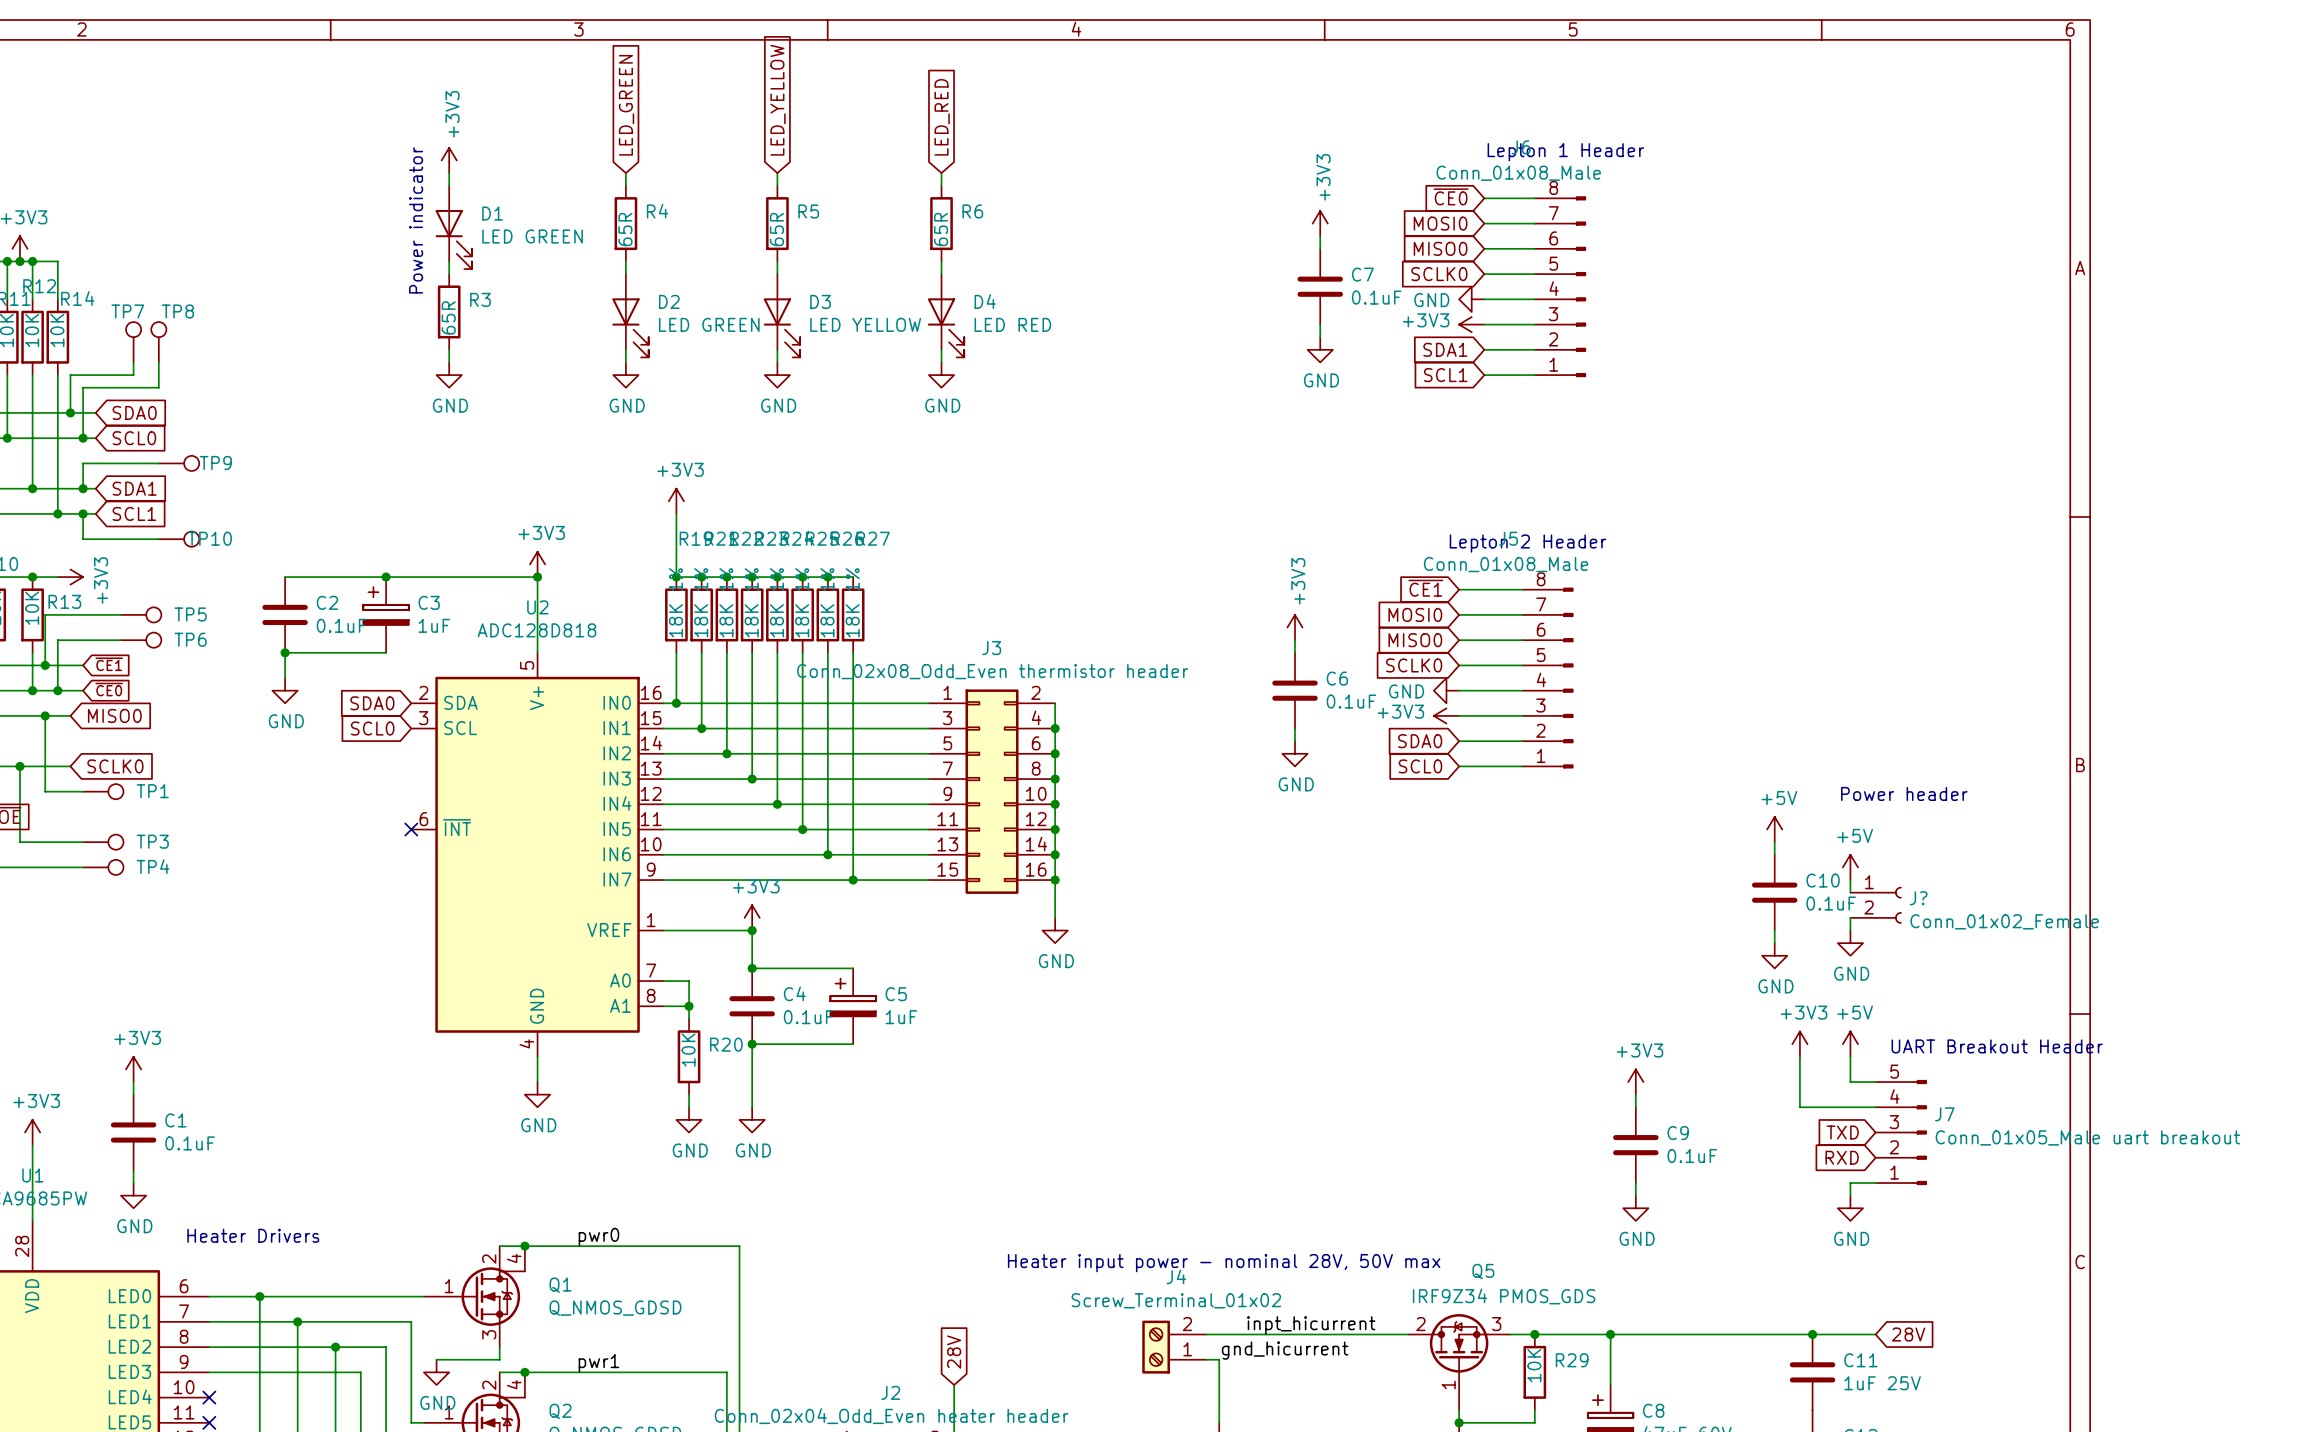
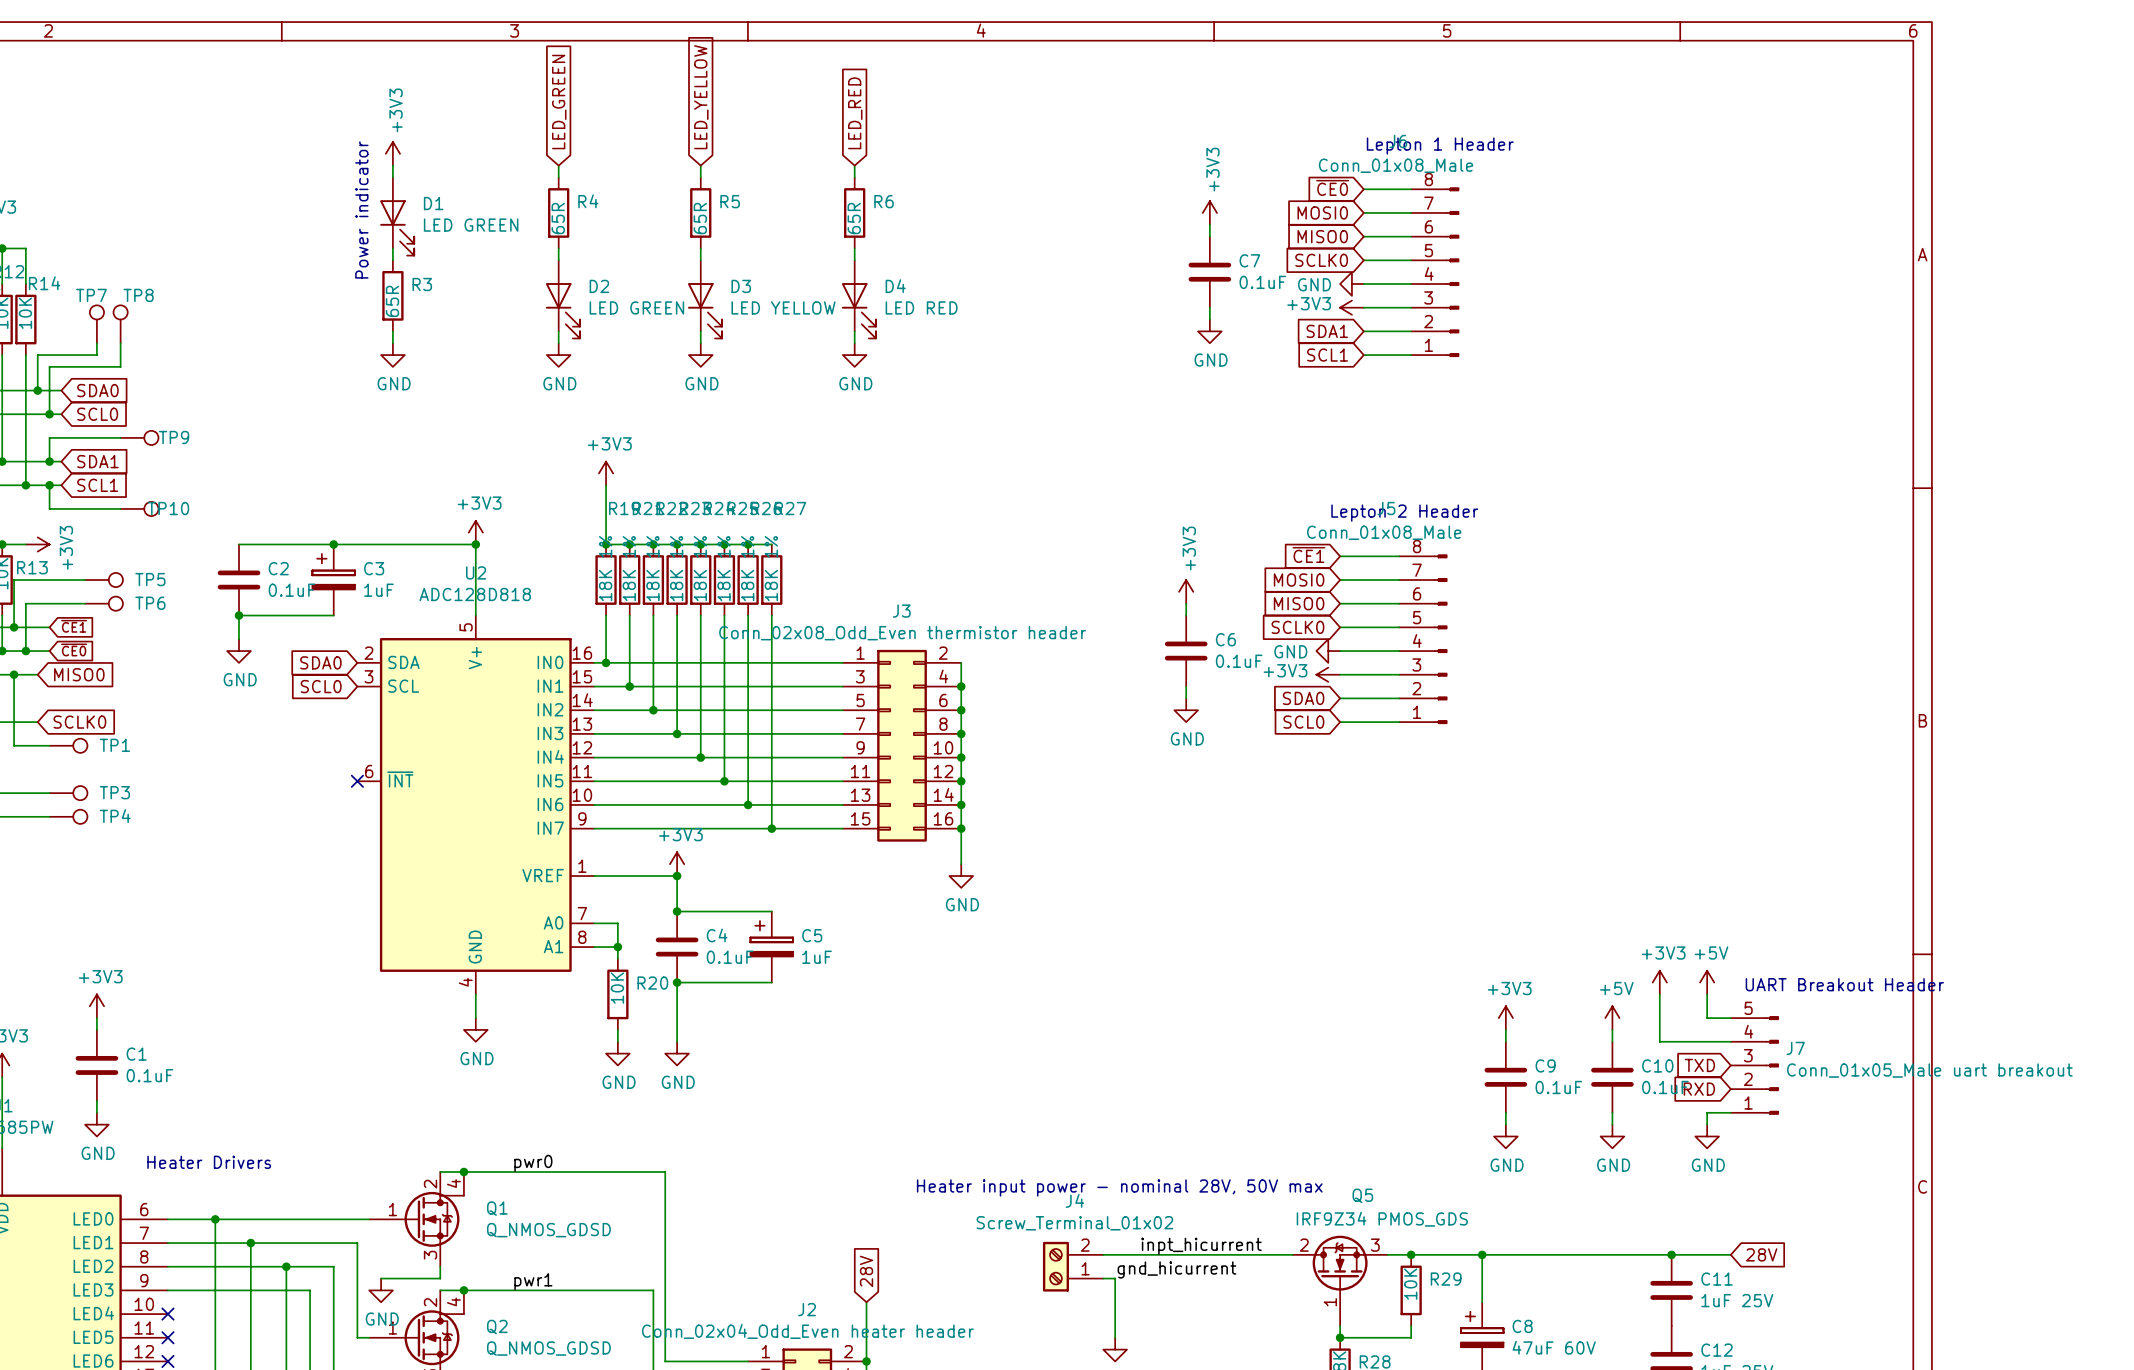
text: Power header (1904, 793) -> none
power symbol: +5V (1774, 829) -> none
wire: (1774, 842) (1774, 854) -> none
power symbol: +5V (1850, 867) -> none
wire: (1850, 880) (1850, 892) -> none
C10 position: (1774, 892) -> (1612, 1077)
J?: Conn_01x02_Female (1876, 905) -> none
wire: (1850, 917) (1850, 930) -> none
wire: (1774, 930) (1774, 943) -> (1612, 1029) (1612, 1041)
power symbol: GND (1850, 943) -> none
power symbol: GND (1774, 955) -> none
power symbol: none -> +5V (1612, 1018)
wire: none -> (1612, 1112) (1612, 1124)
power symbol: none -> GND (1612, 1136)

